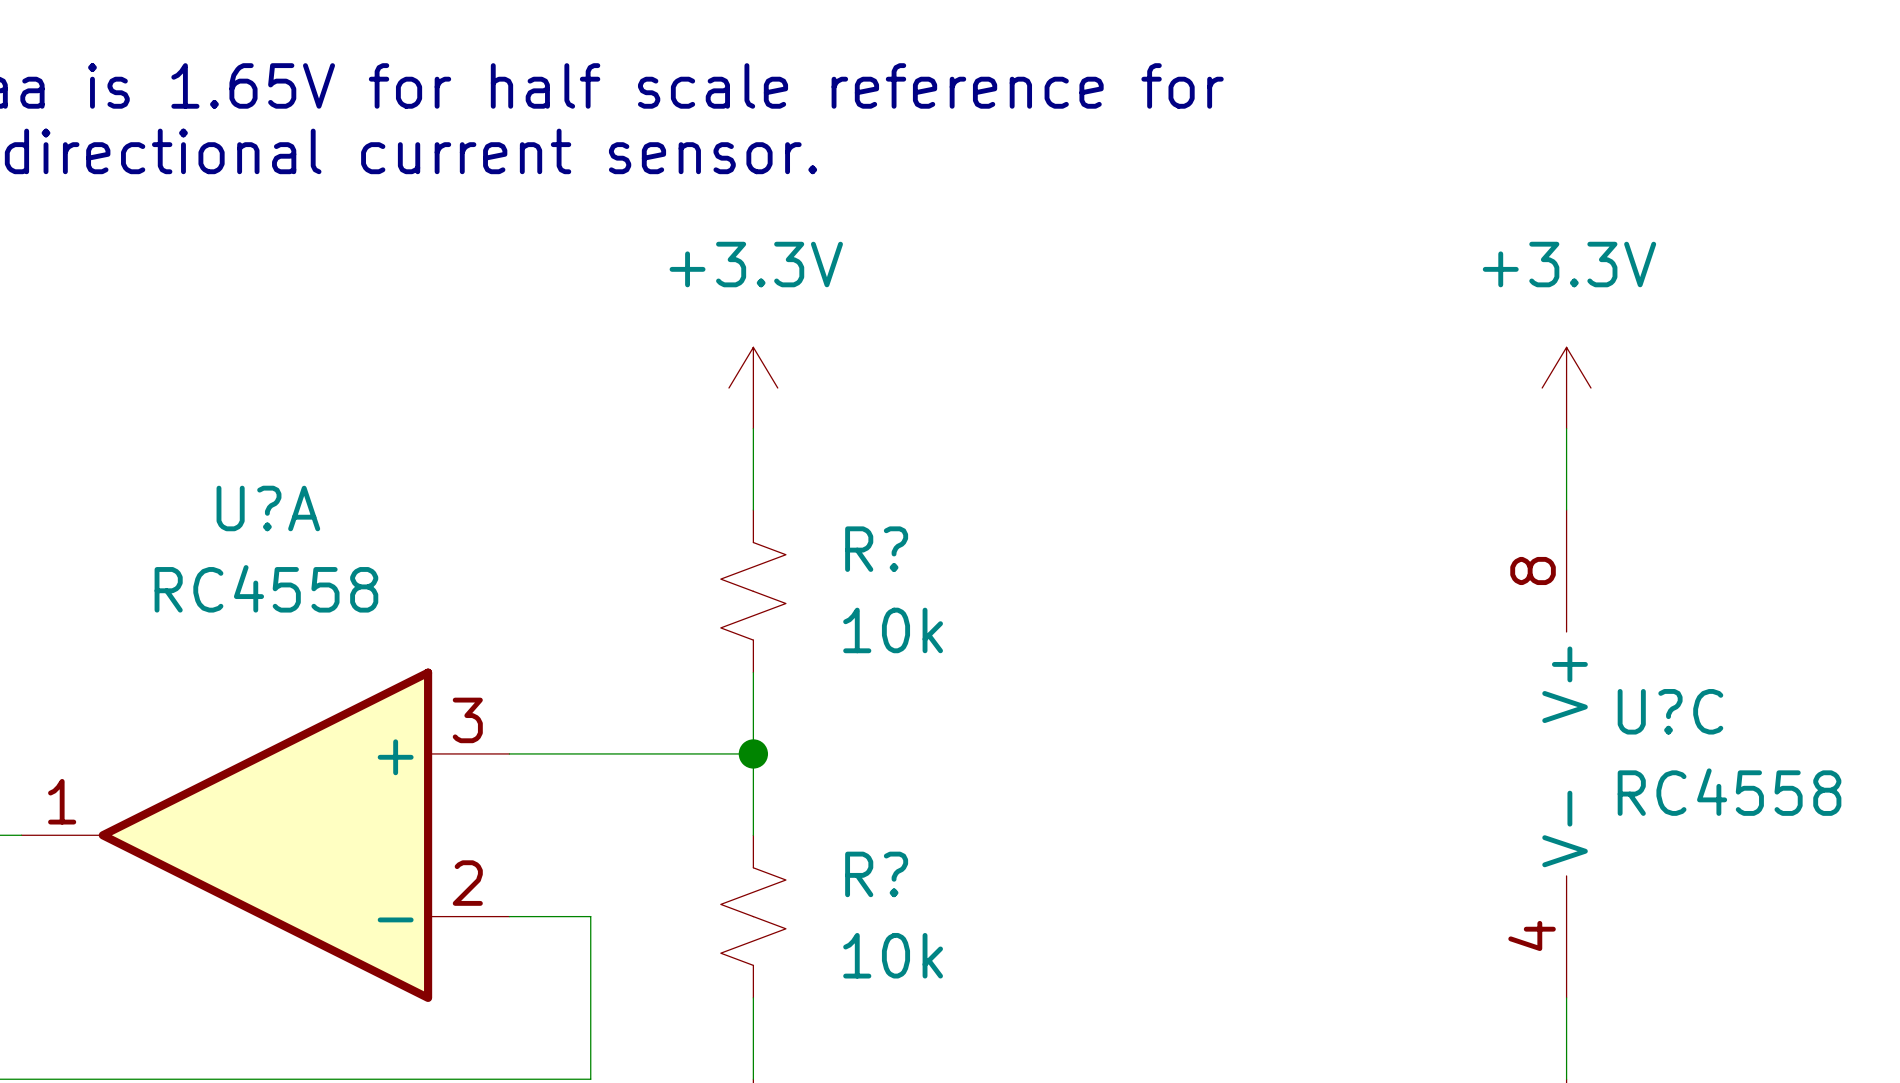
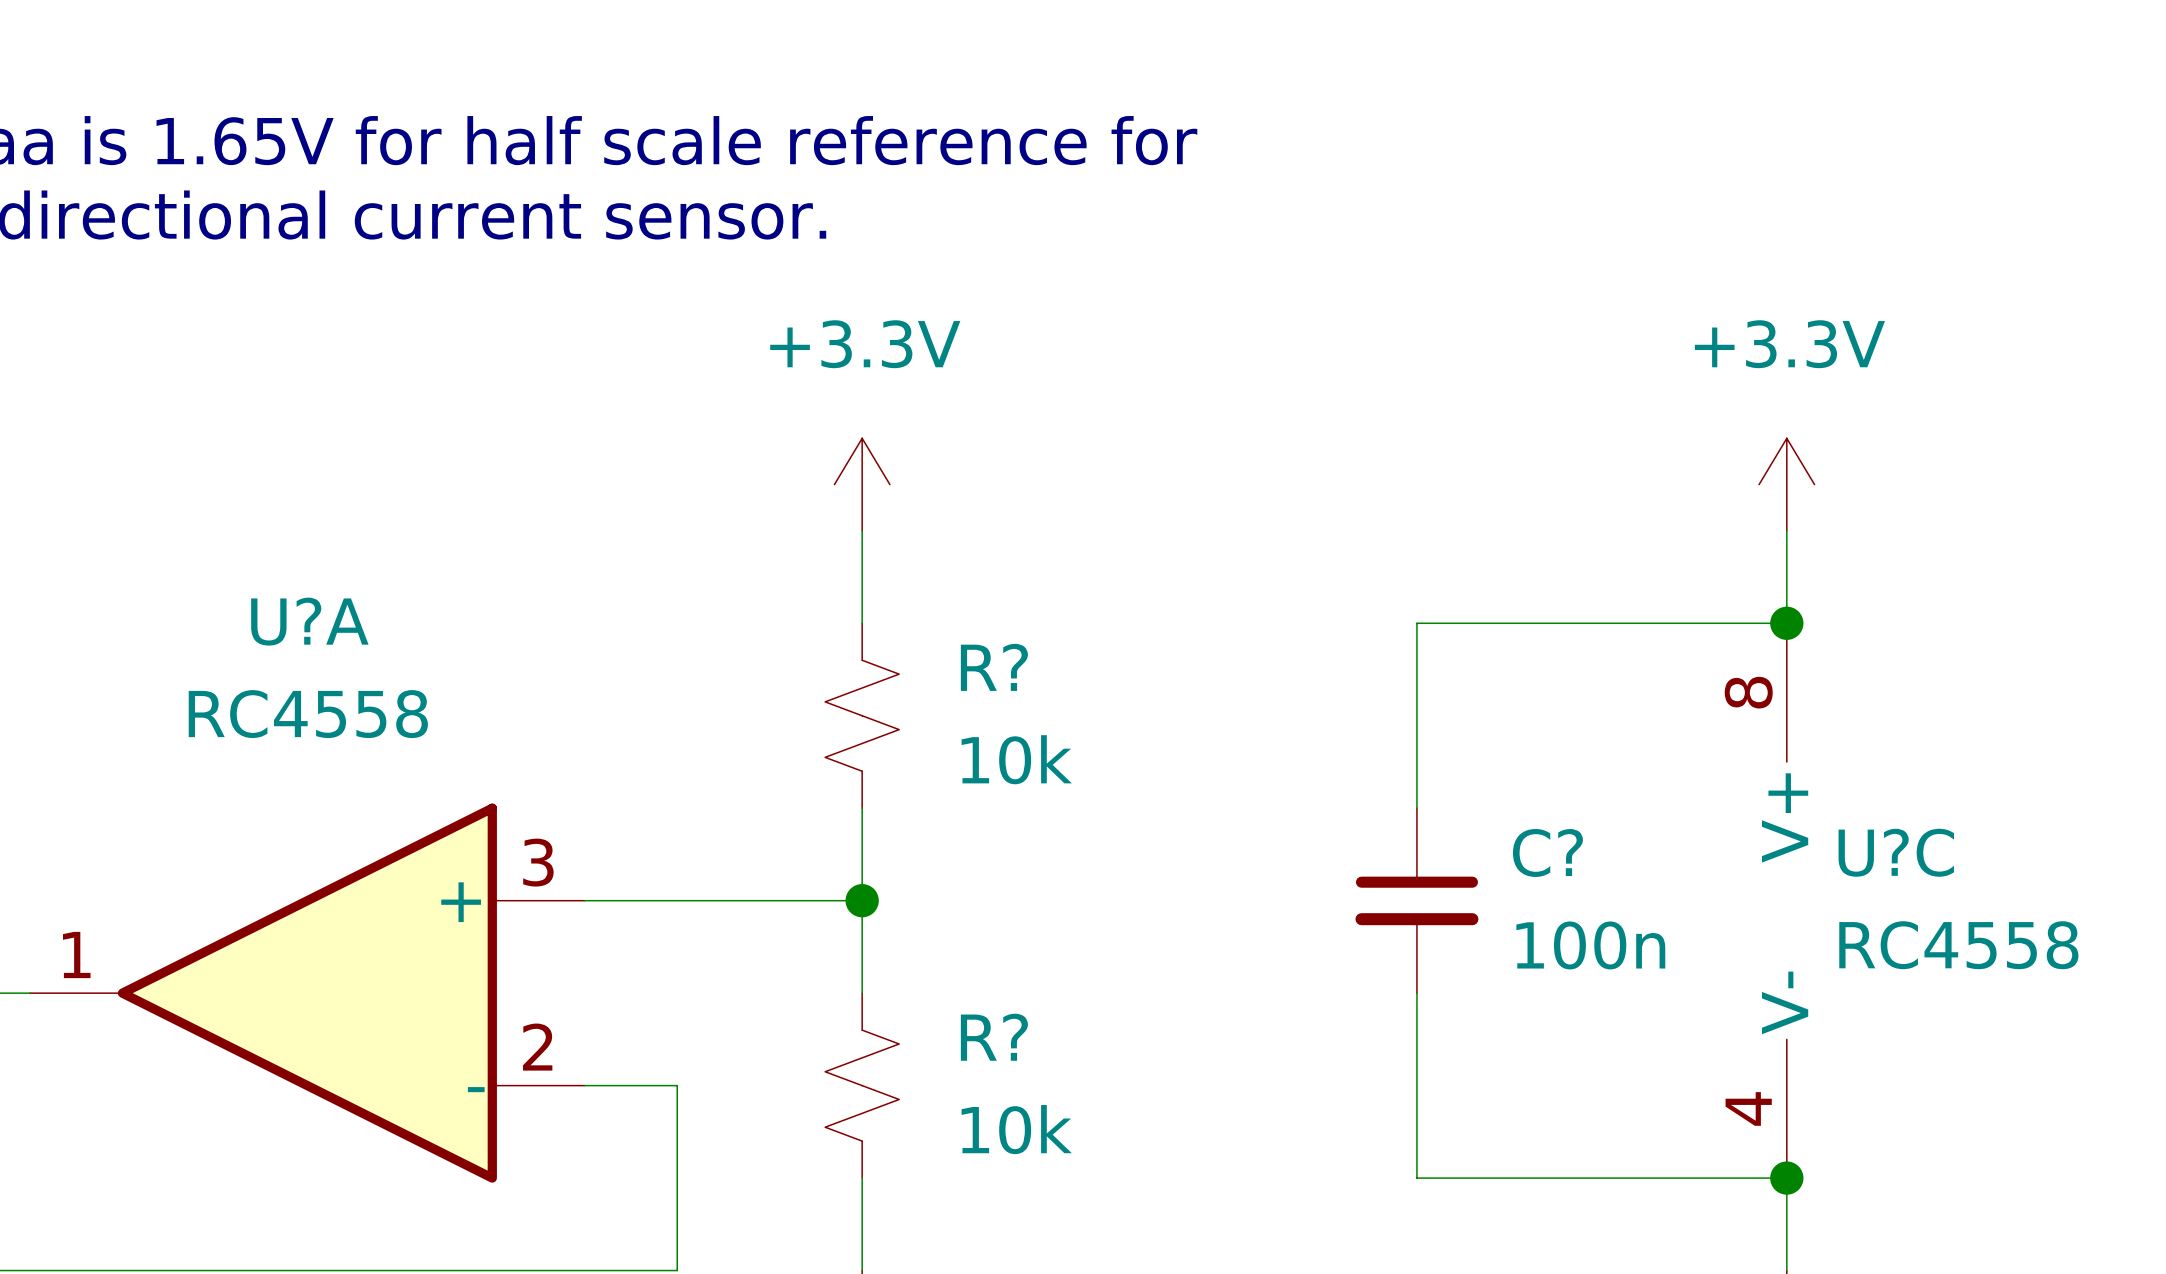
wire: none -> (1786, 623) (1416, 623) (1416, 808)
junction: none -> (1786, 623)
C?: none -> 100n (1416, 900)
wire: none -> (1416, 993) (1416, 1178) (1786, 1178)
junction: none -> (1786, 1178)

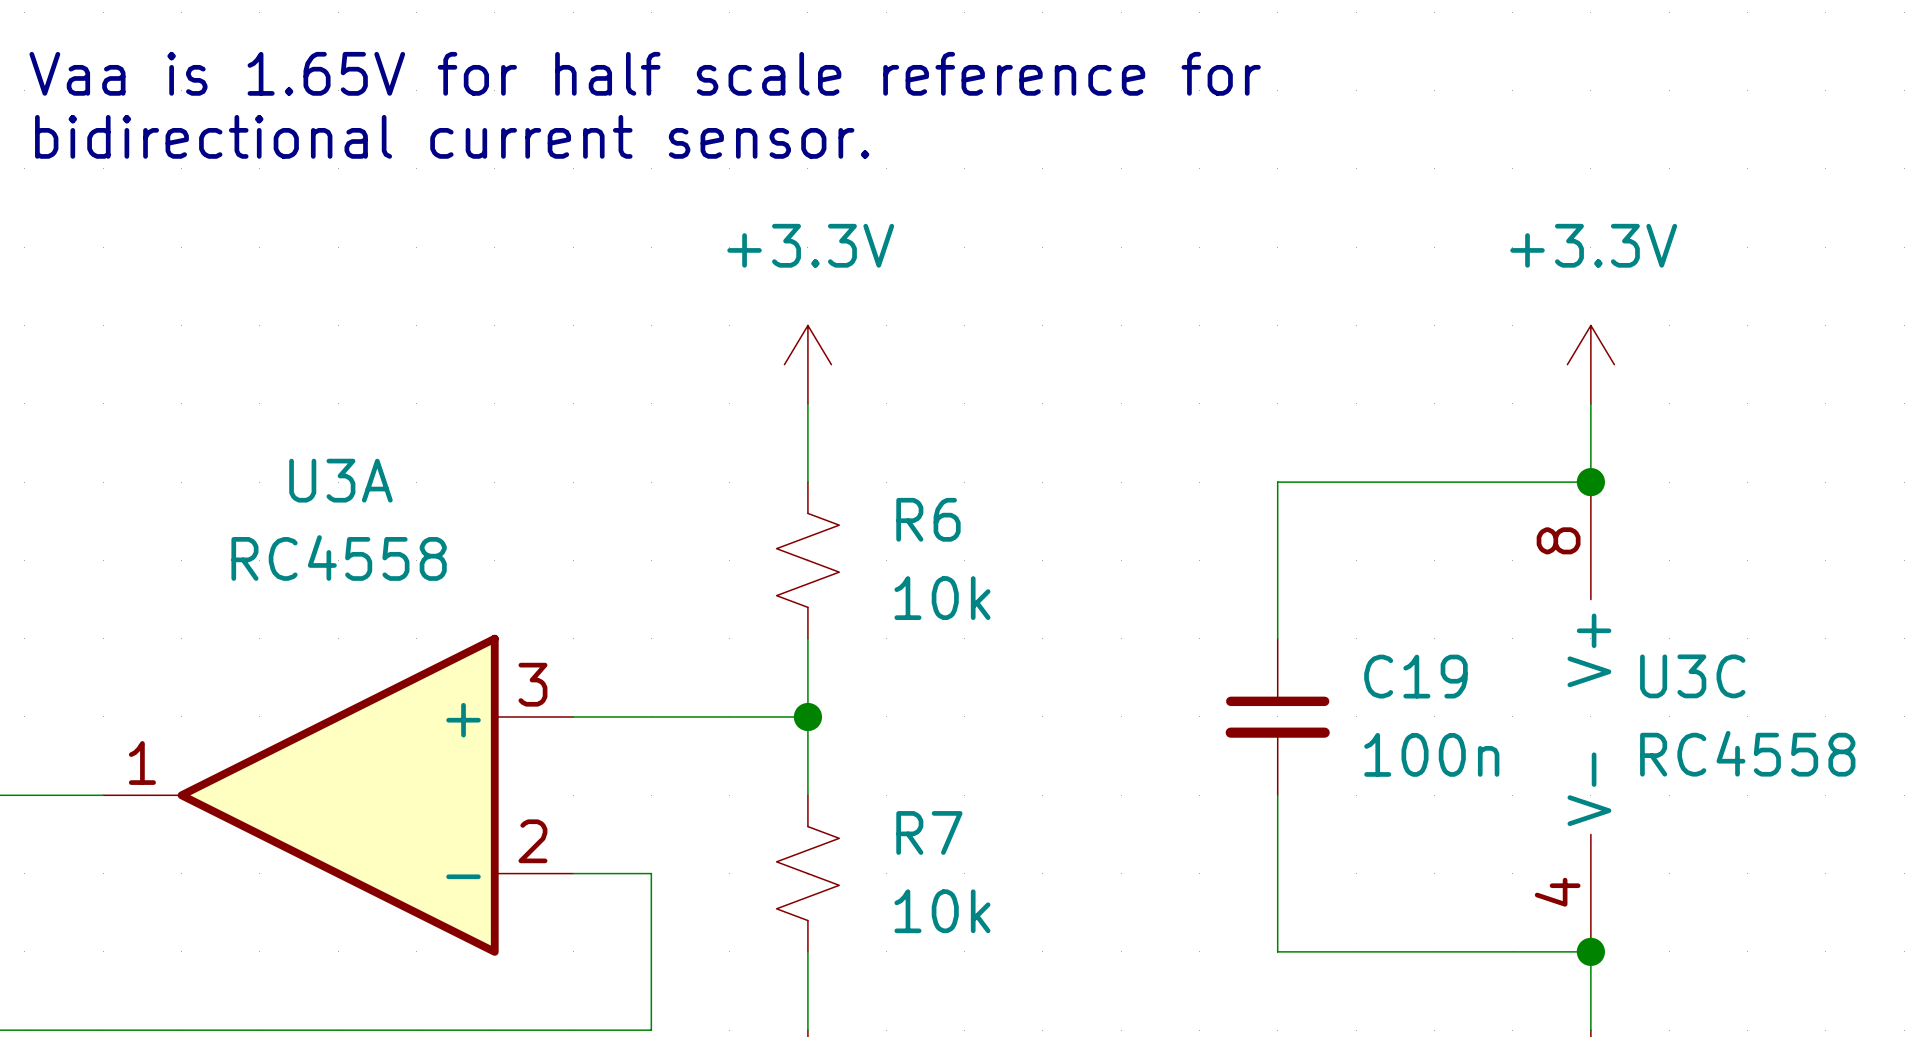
U?A name: U?A (309, 621) -> U3A (340, 480)
R? name: R? (994, 667) -> R6 (928, 519)
C? name: C? (1547, 852) -> C19 (1415, 676)
U?C name: U?C (1896, 852) -> U3C (1692, 676)
R? name: R? (994, 1037) -> R7 (929, 832)

